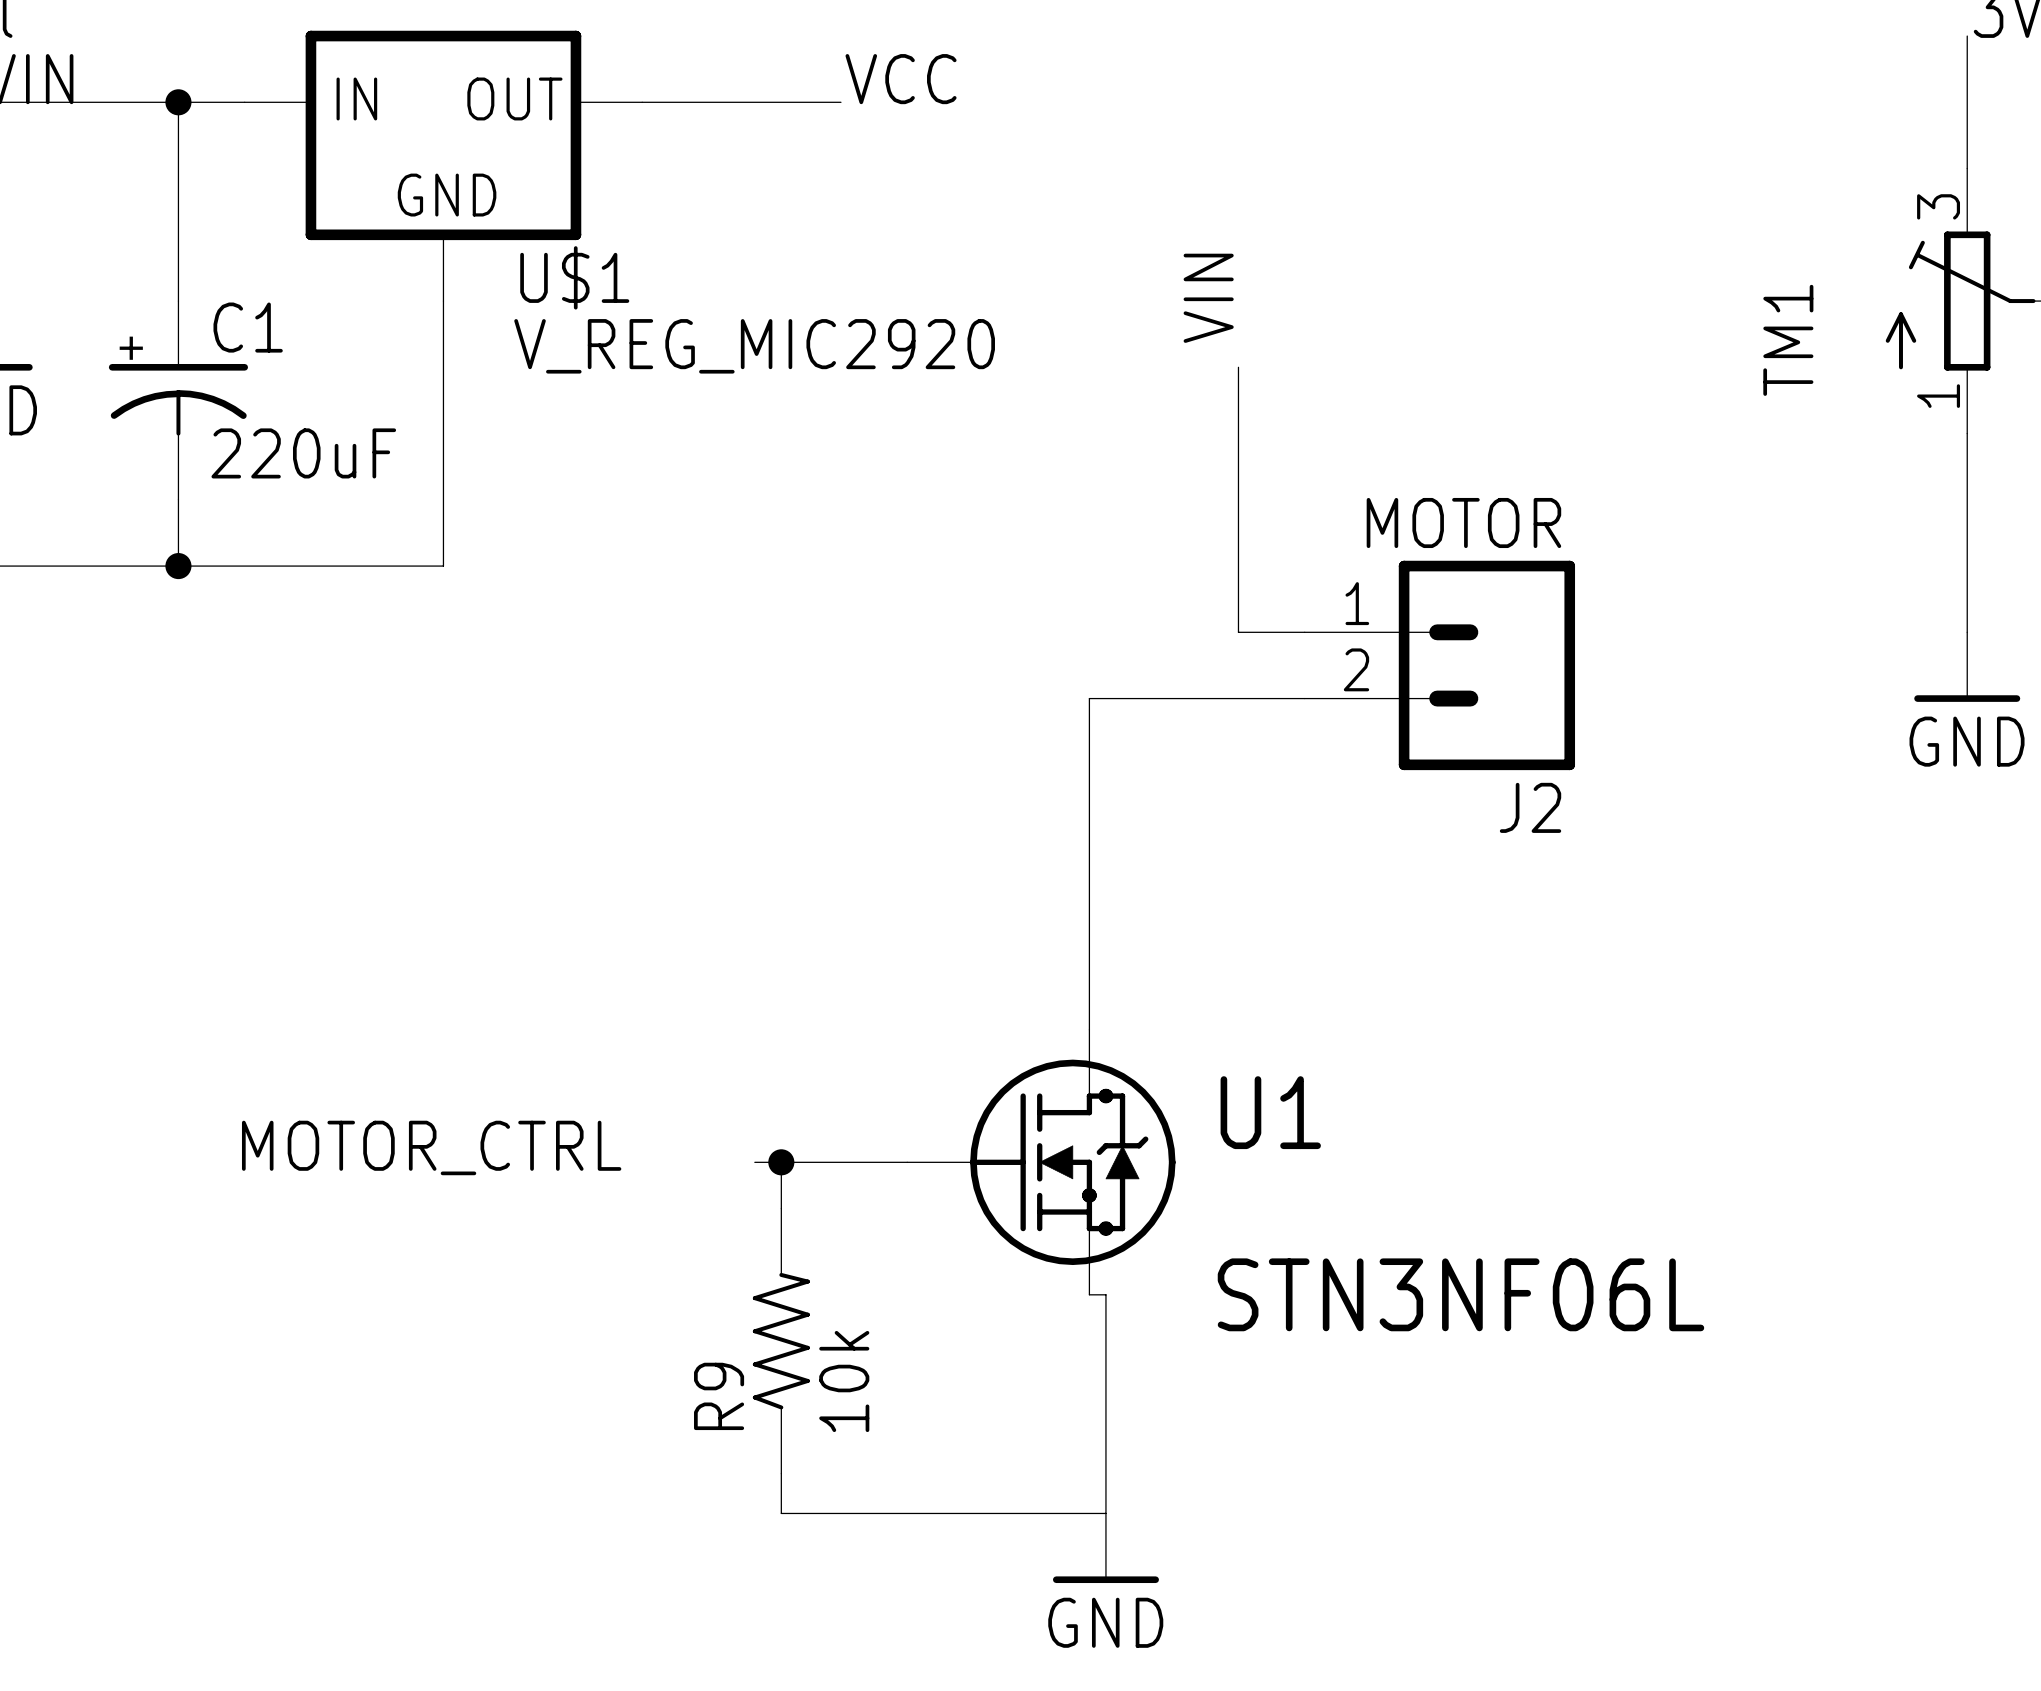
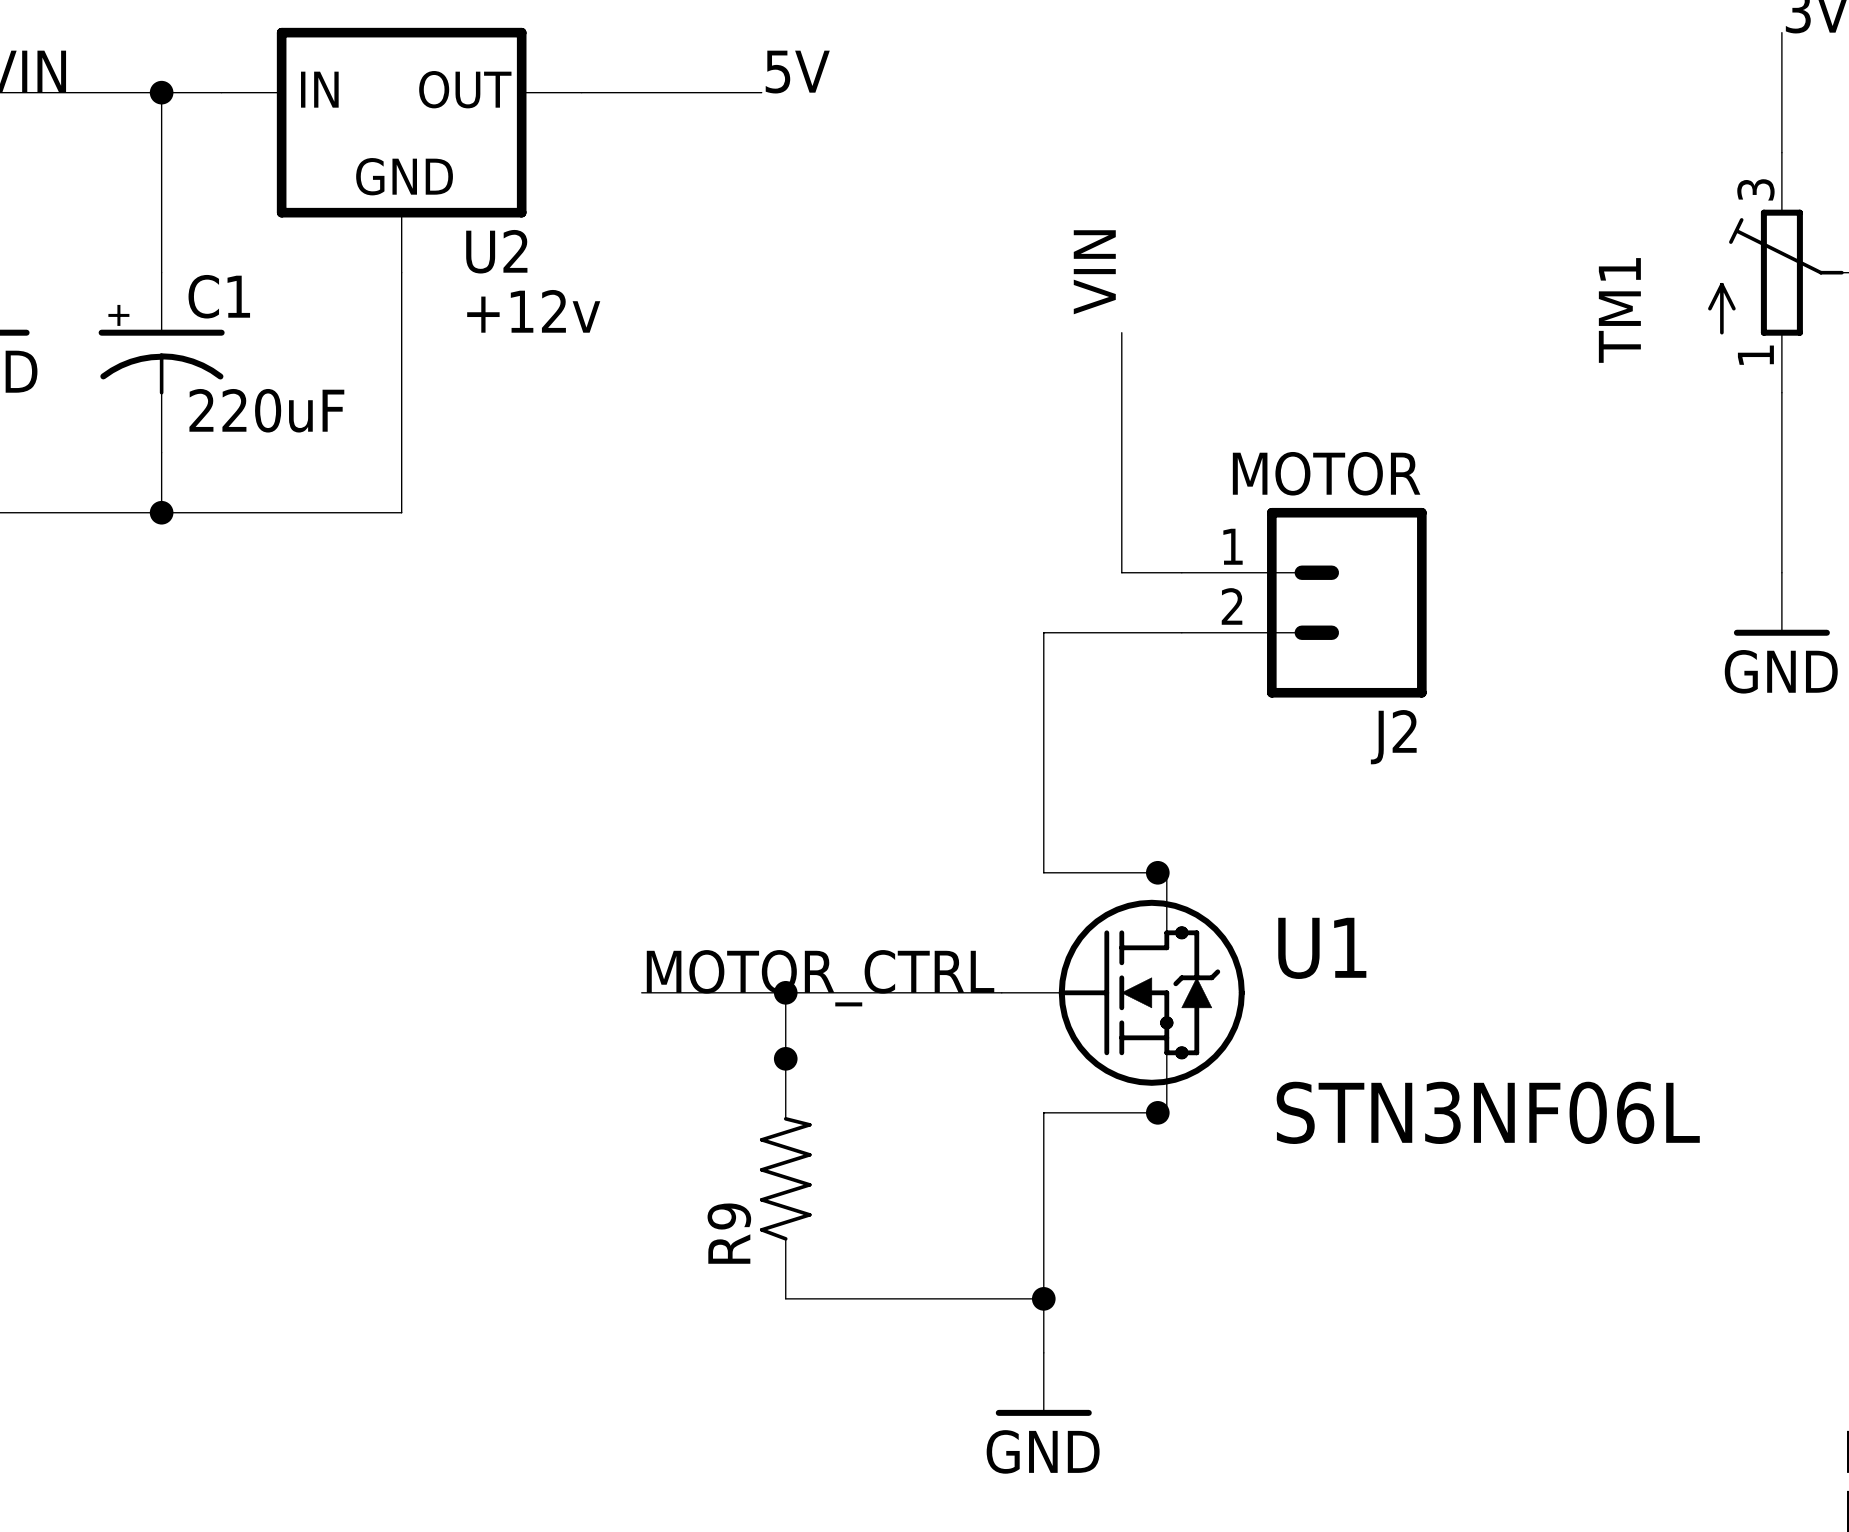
label: VCC (901, 79) -> 5V (797, 72)
U$1 name: U$1 (574, 277) -> U2 (496, 251)
U$1 value: V_REG_MIC2920 (754, 346) -> +12v (533, 311)
wire: (1152, 698) (1089, 698) (1089, 1029) -> (1043, 632) (1043, 872) (1157, 872)
junction: none -> (1157, 872)
wire: none -> (641, 992) (1001, 992)
wire: none -> (785, 992) (785, 1058)
junction: none -> (785, 992)
label position: MOTOR_CTRL (431, 1147) -> MOTOR_CTRL (820, 978)
wire: (754, 1162) (907, 1162) -> none
wire: (781, 1162) (781, 1208) -> none
junction: (781, 1162) -> none
U1 position: (1041, 1162) -> (1123, 992)
junction: none -> (785, 1058)
wire: none -> (1157, 1112) (1043, 1112) (1043, 1352)
junction: none -> (1157, 1112)
wire: (1089, 1294) (1105, 1294) (1105, 1513) (781, 1513) (781, 1473) -> none
R9 position: (781, 1341) -> (785, 1178)
R9 value: 10k (844, 1381) -> none
wire: none -> (785, 1298) (1049, 1298)
junction: none -> (1043, 1298)
power symbol position: GND (1105, 1548) -> GND (1043, 1384)

